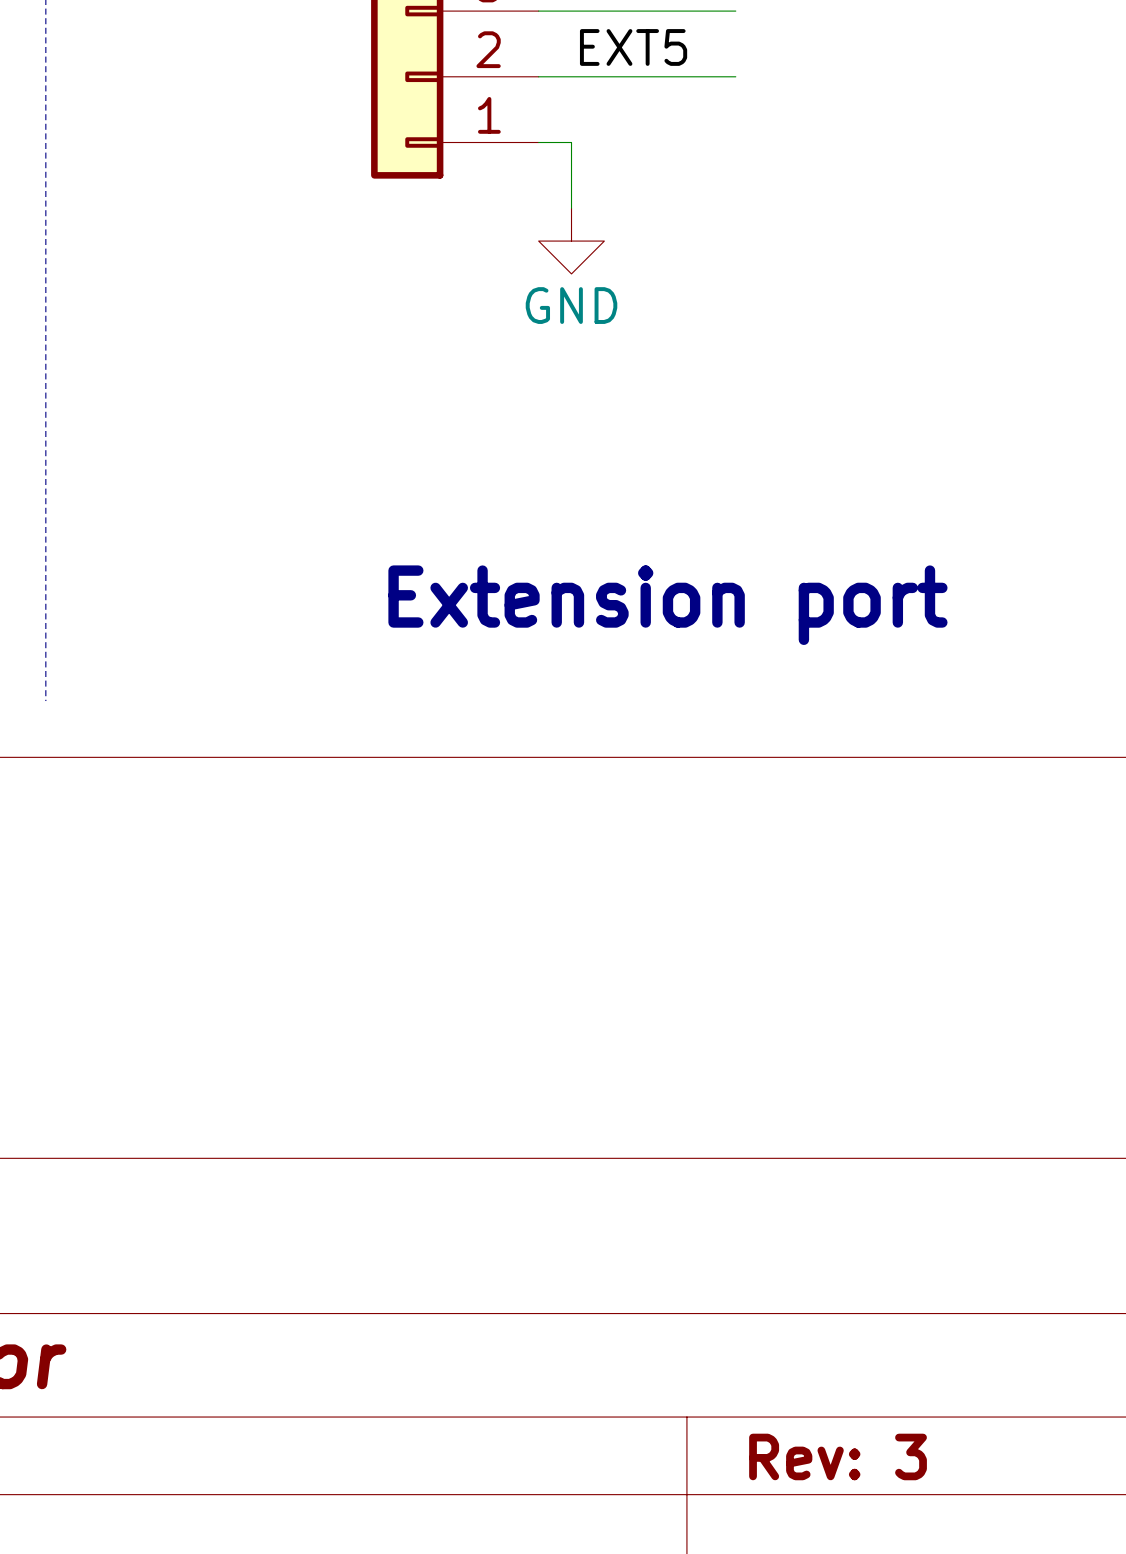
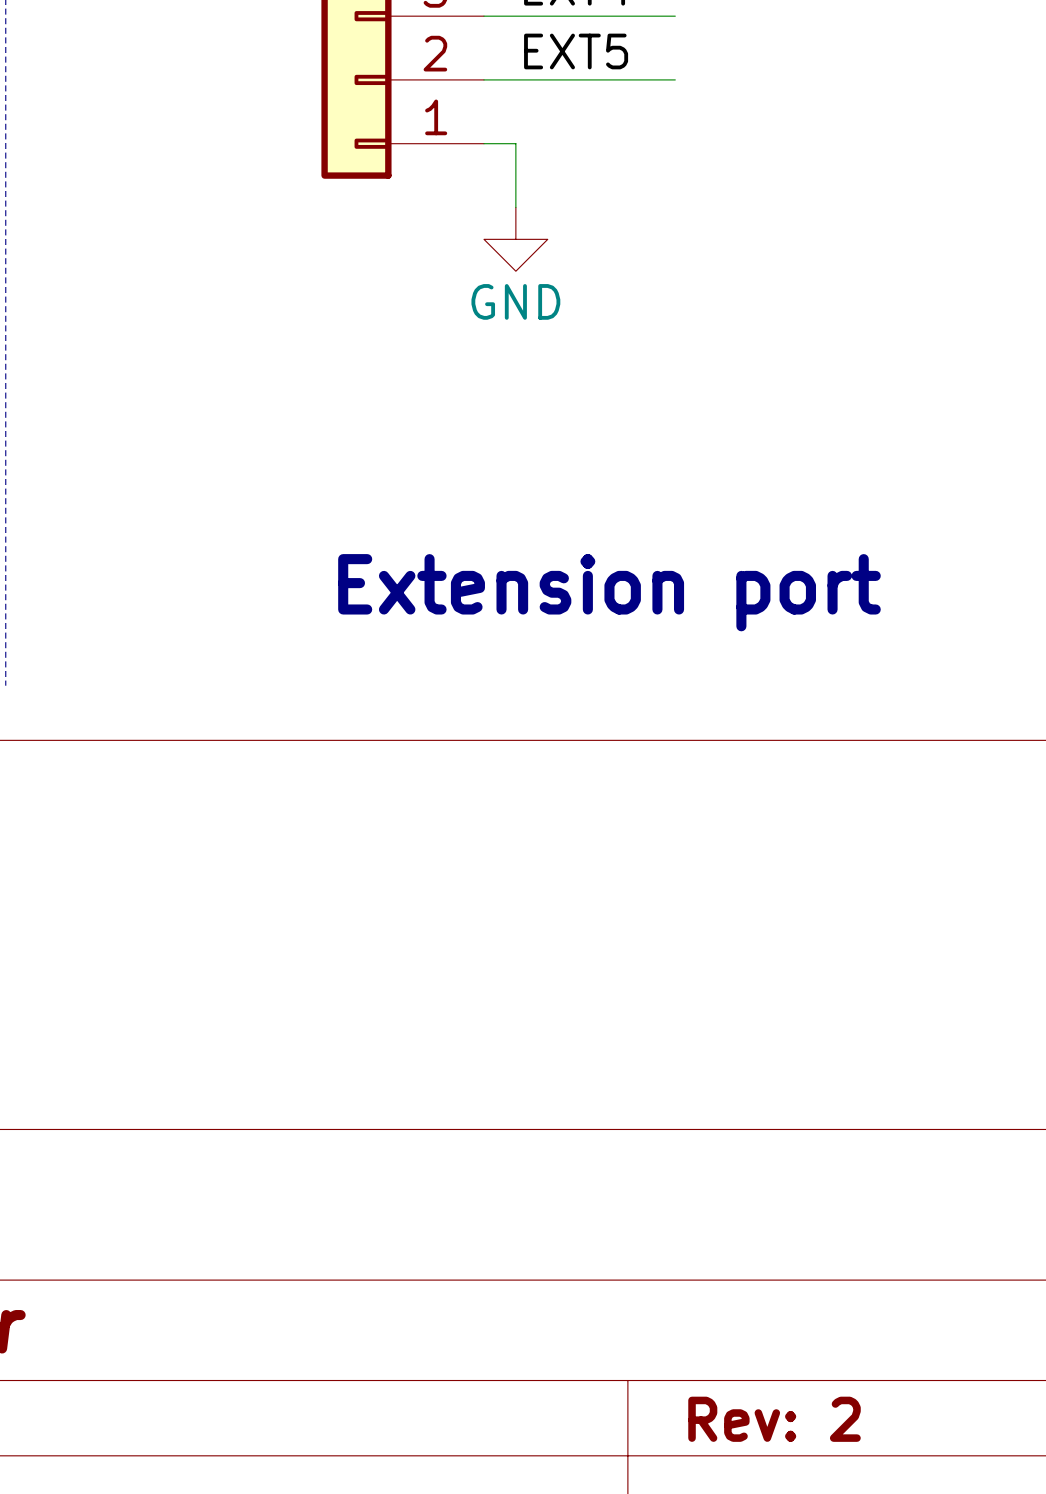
title block: Rev: 3 (838, 1456) -> Rev: 2 (774, 1419)

